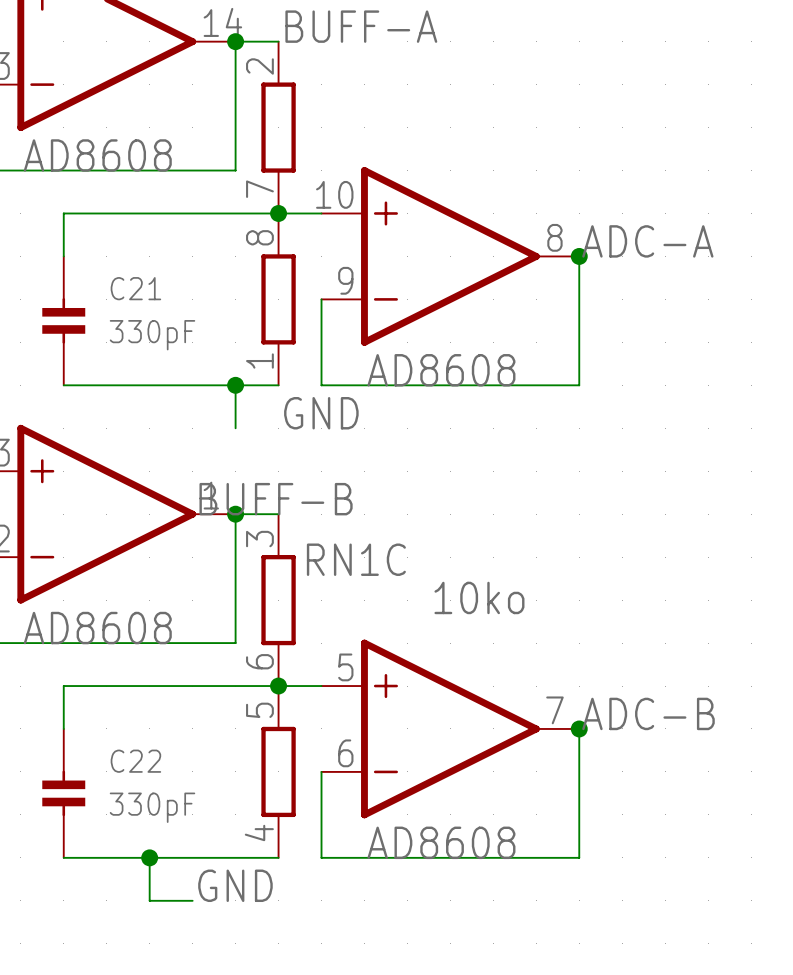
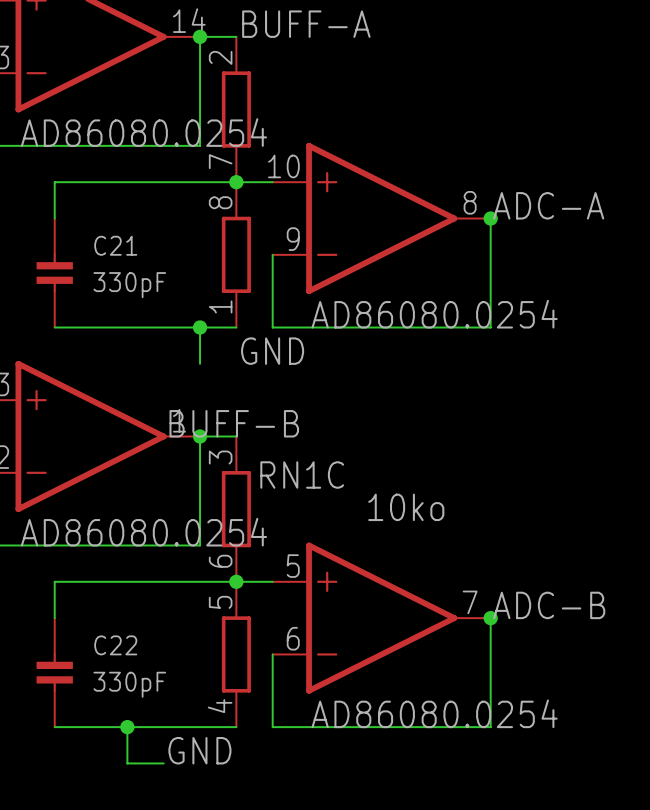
part value: AD8608 (97, 155) -> AD86080.0254 (143, 132)
part value: AD8608 (441, 370) -> AD86080.0254 (434, 314)
part value: AD8608 (97, 628) -> AD86080.0254 (143, 532)
part value: AD8608 (441, 842) -> AD86080.0254 (434, 713)

